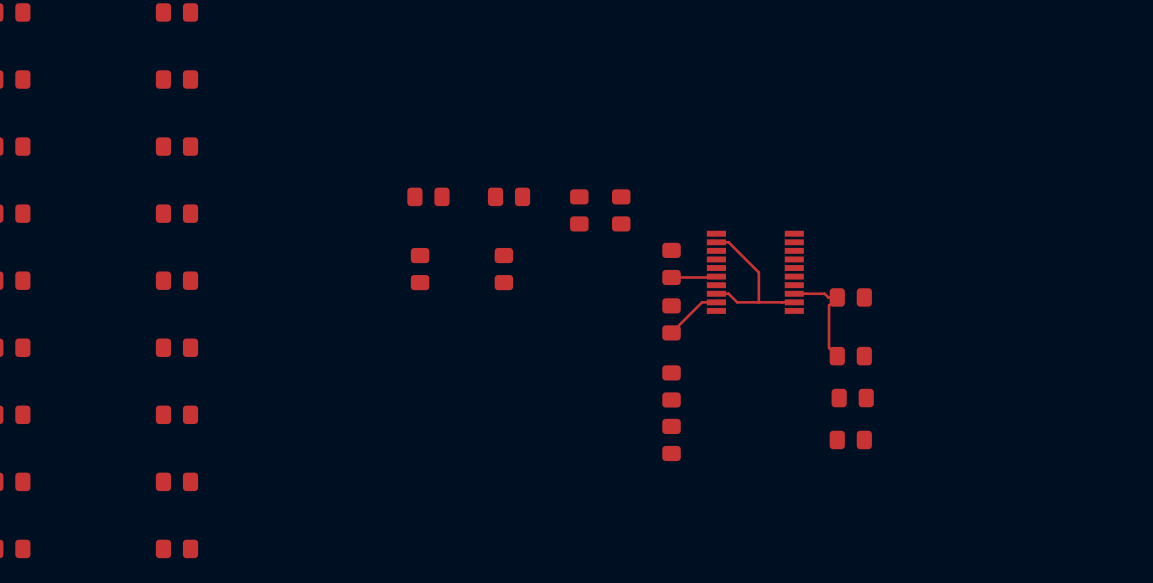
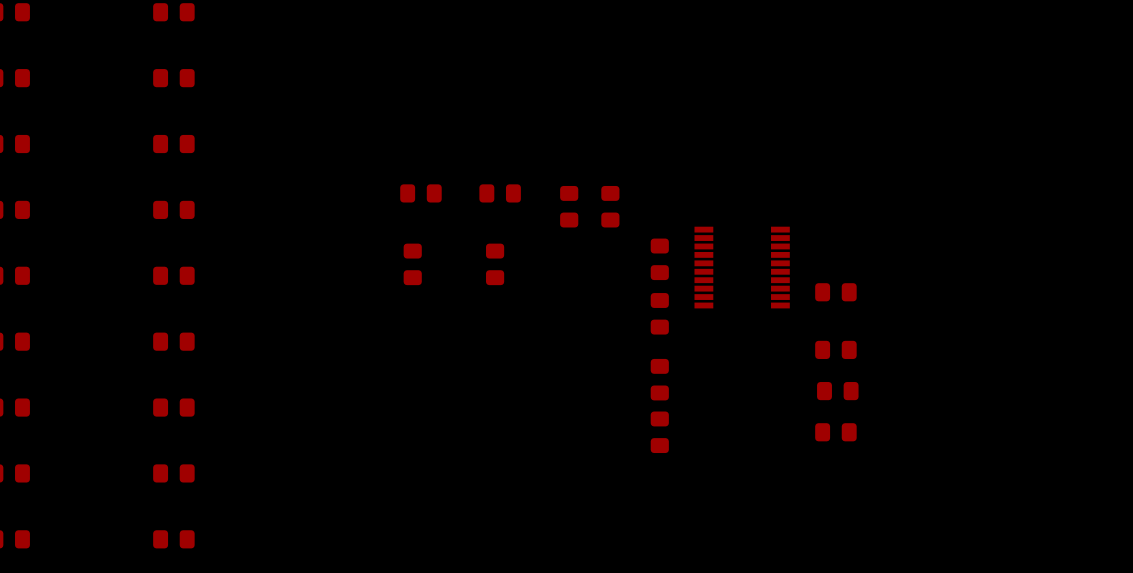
top track: (716, 242) (728, 242) (758, 272) (758, 302) -> none
top track: (716, 276) (671, 277) -> none
top track: (716, 293) (728, 293) (737, 302) (794, 302) -> none
top track: (794, 293) (824, 293) (828, 297) (837, 297) (829, 305) (829, 347) (837, 356) -> none
top track: (716, 302) (702, 302) (671, 332) -> none

